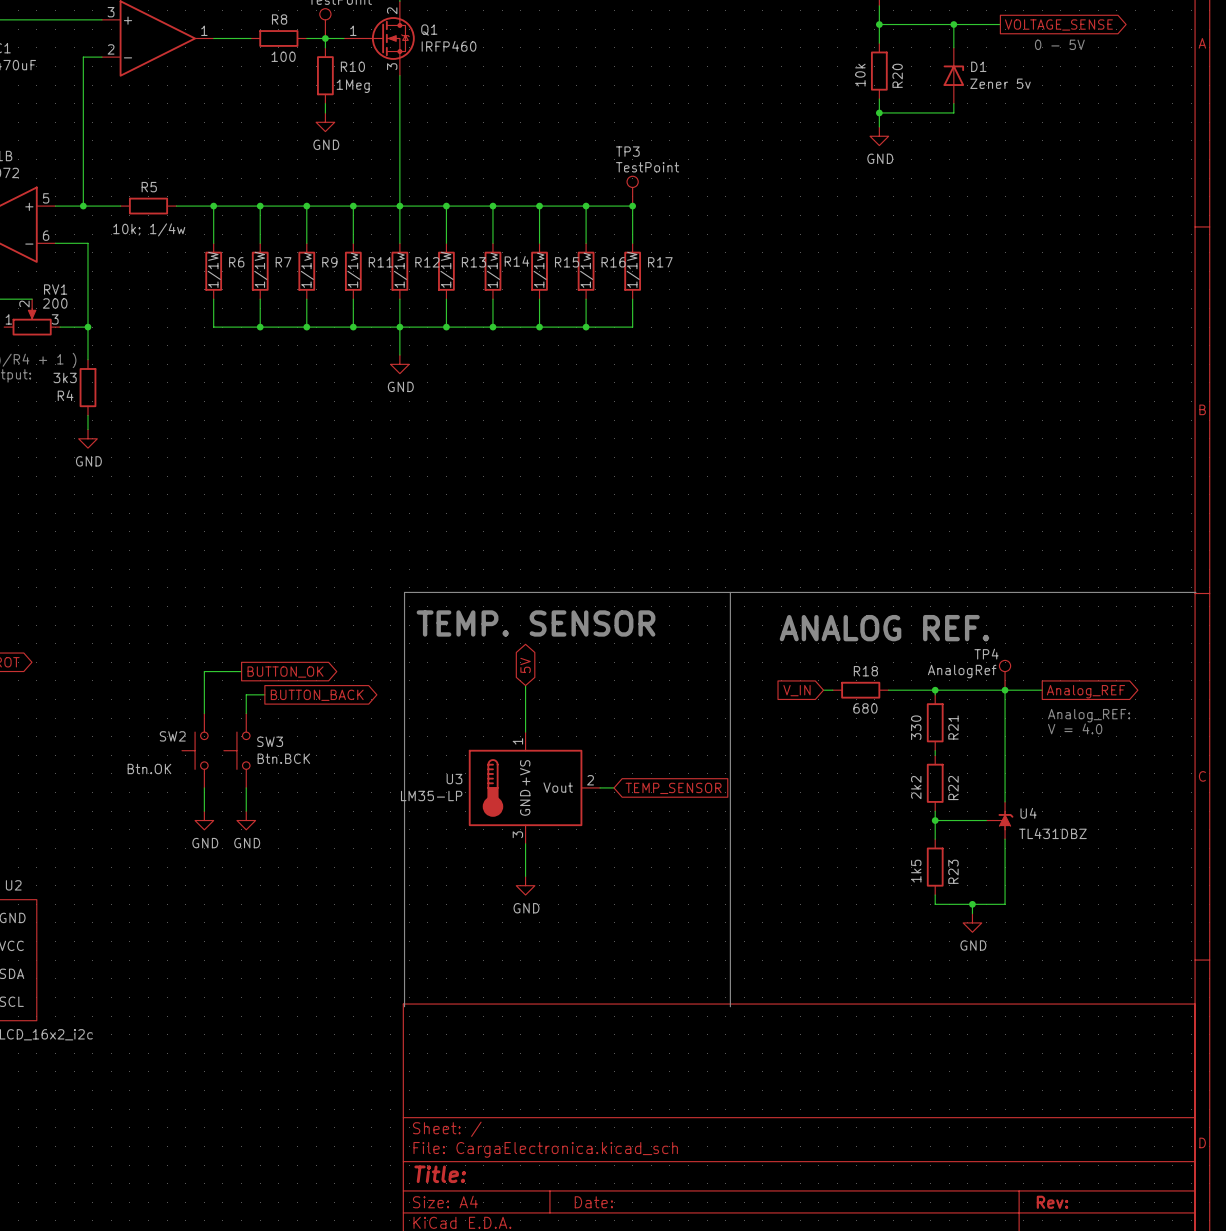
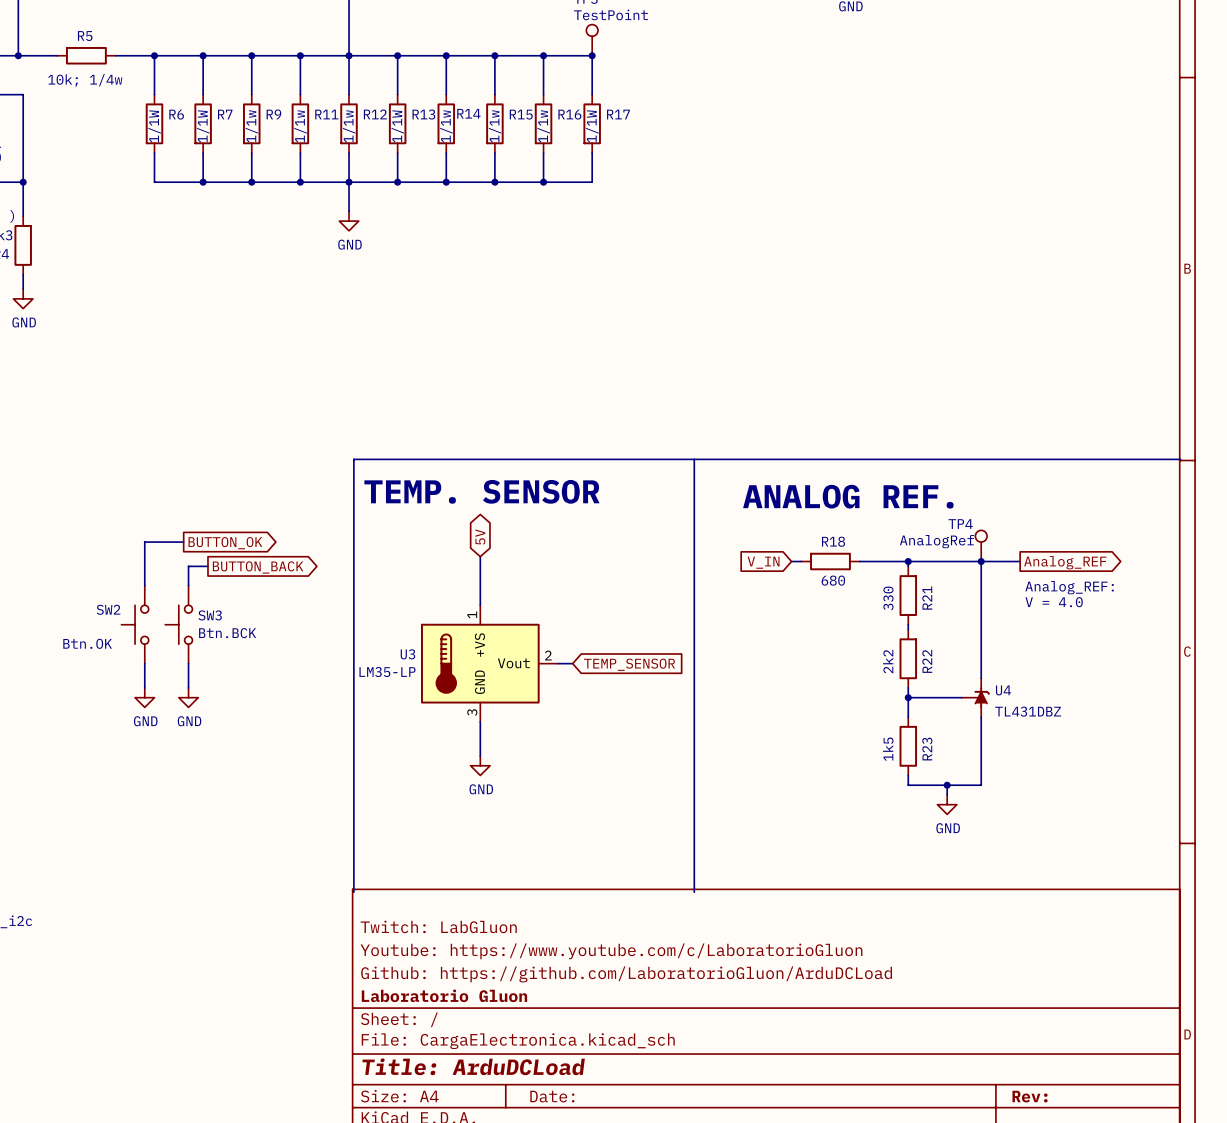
title block: none -> Twitch: LabGluon (438, 926)
title block: none -> Youtube: https://www.youtube.com/c/LaboratorioGluon (611, 951)
title block: none -> Github: https://github.com/LaboratorioGluon/ArduDCLoad (626, 974)
title block: none -> Laboratorio Gluon (444, 995)
title block: Title: (440, 1174) -> Title: ArduDCLoad (473, 1066)

